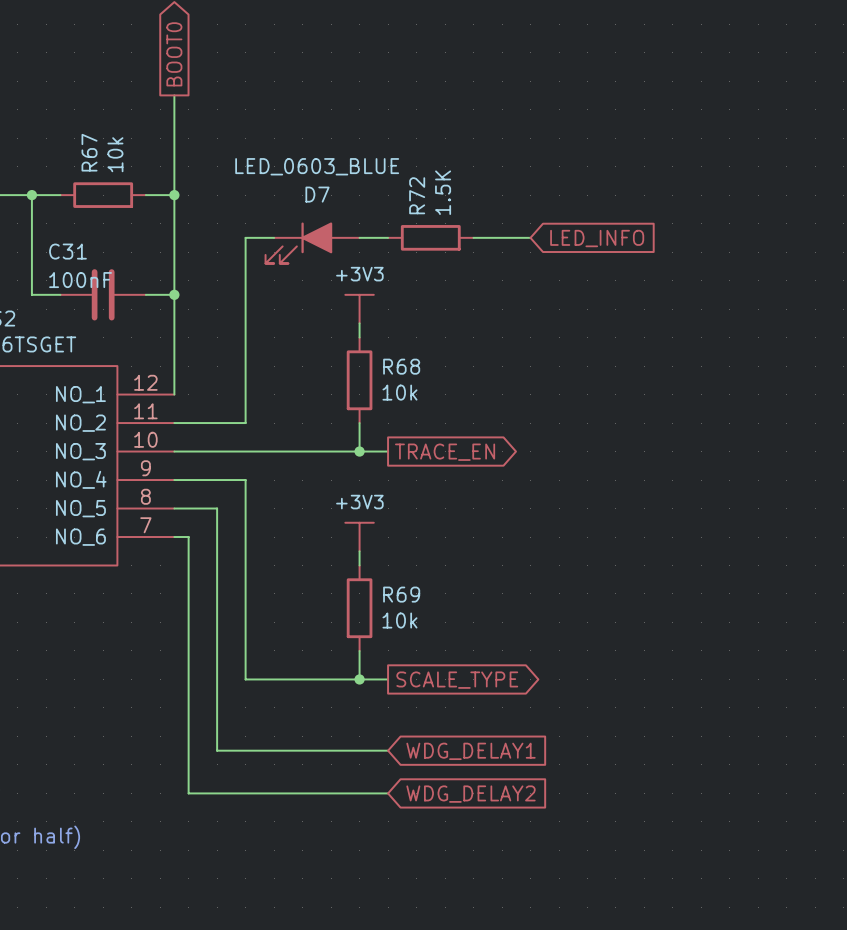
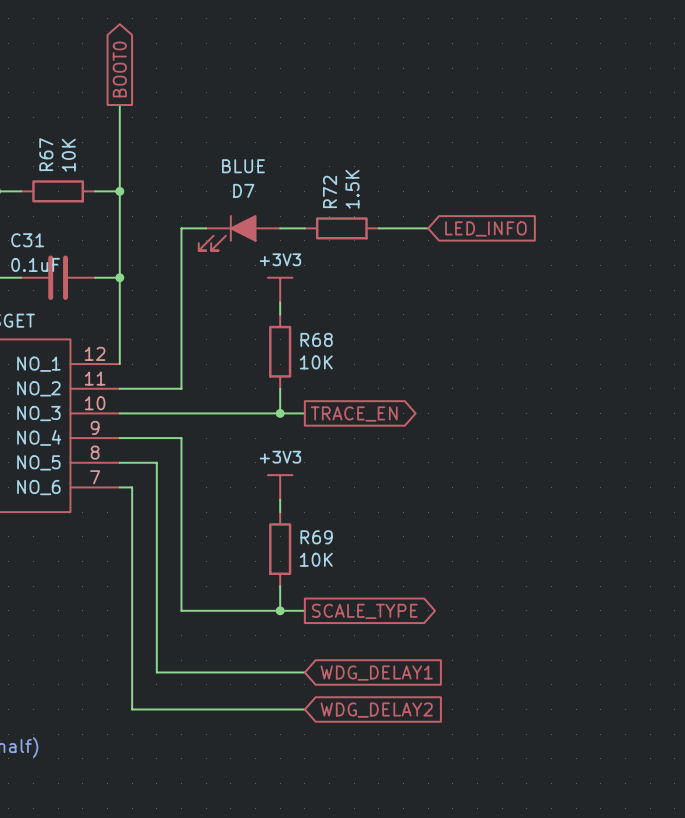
R67 value: 10k (115, 154) -> 10K (68, 155)
D7 value: LED_0603_BLUE (317, 166) -> BLUE (243, 166)
C31 value: 100nF (80, 280) -> 0.1uF (35, 264)
R68 value: 10k (399, 392) -> 10K (316, 362)
R69 value: 10k (399, 620) -> 10K (316, 559)

